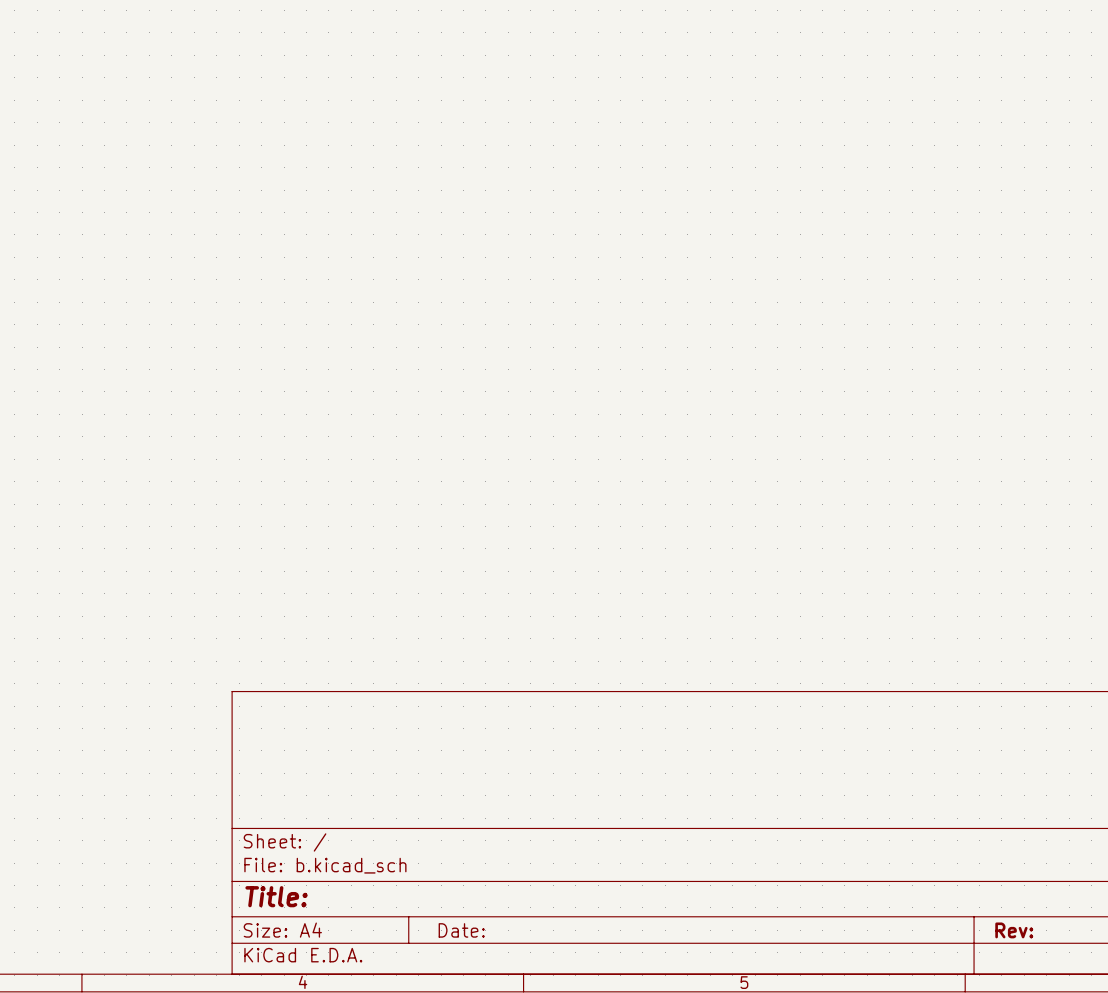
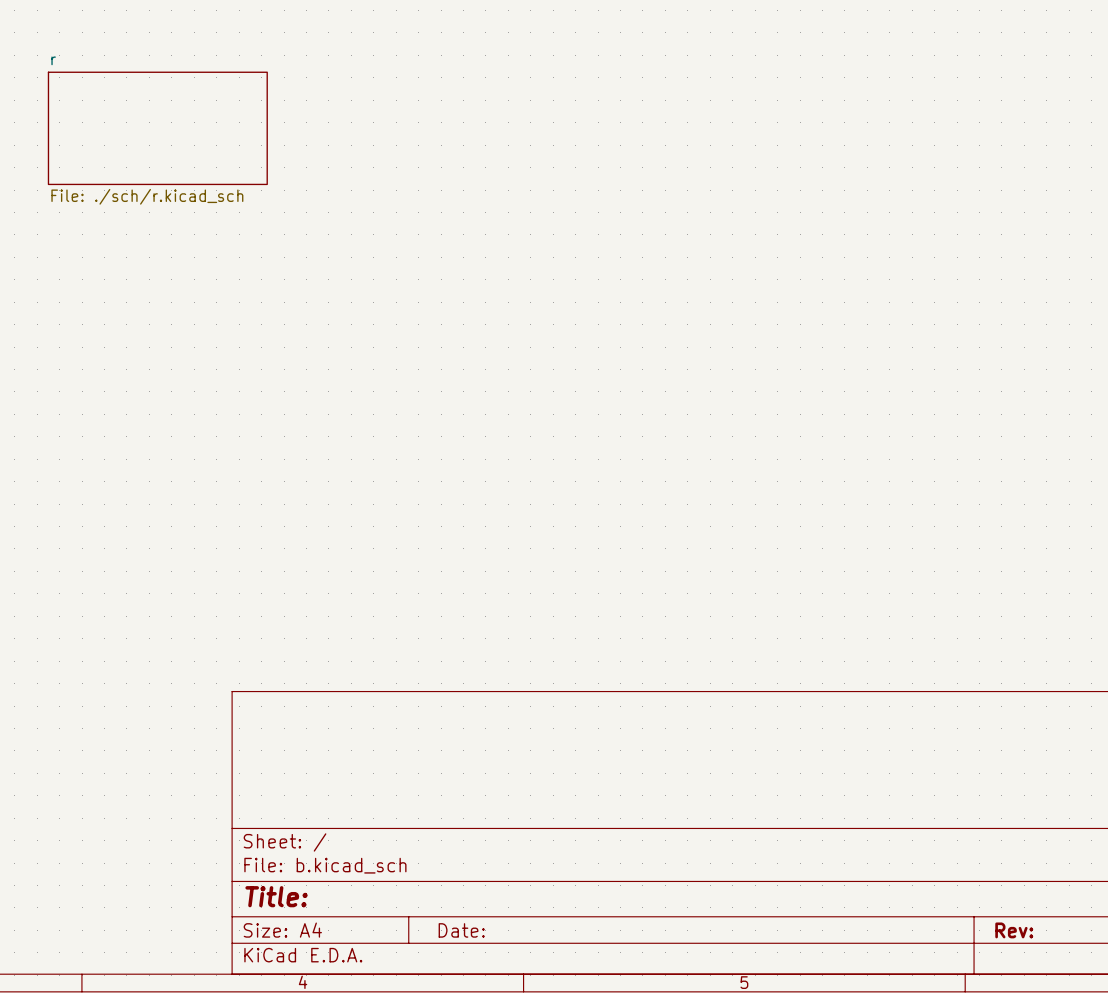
sheet r: none -> File: ./sch/r.kicad_sch (157, 128)

